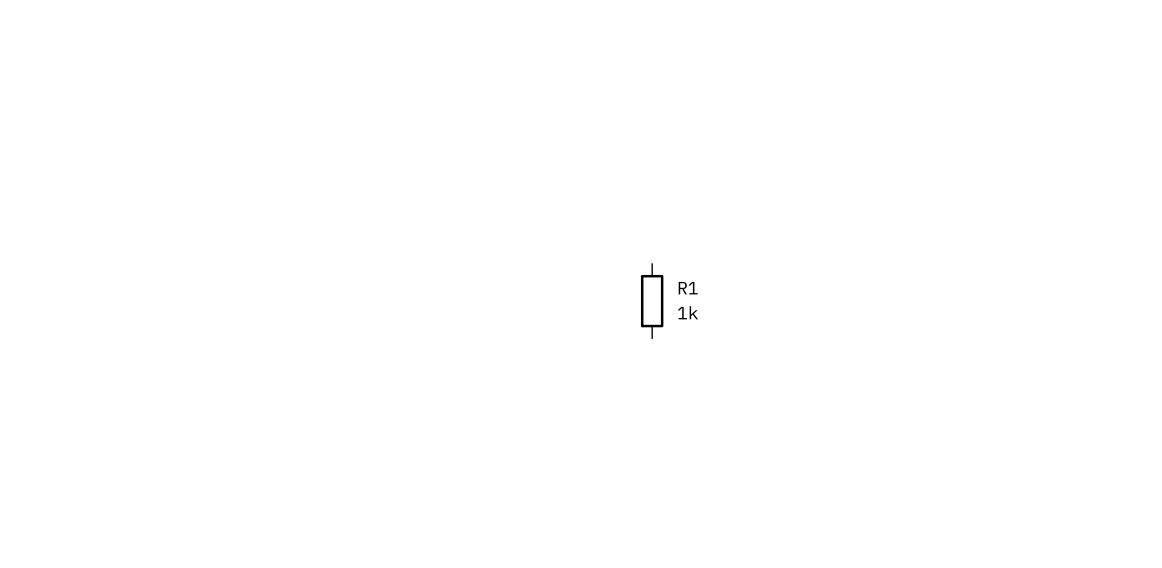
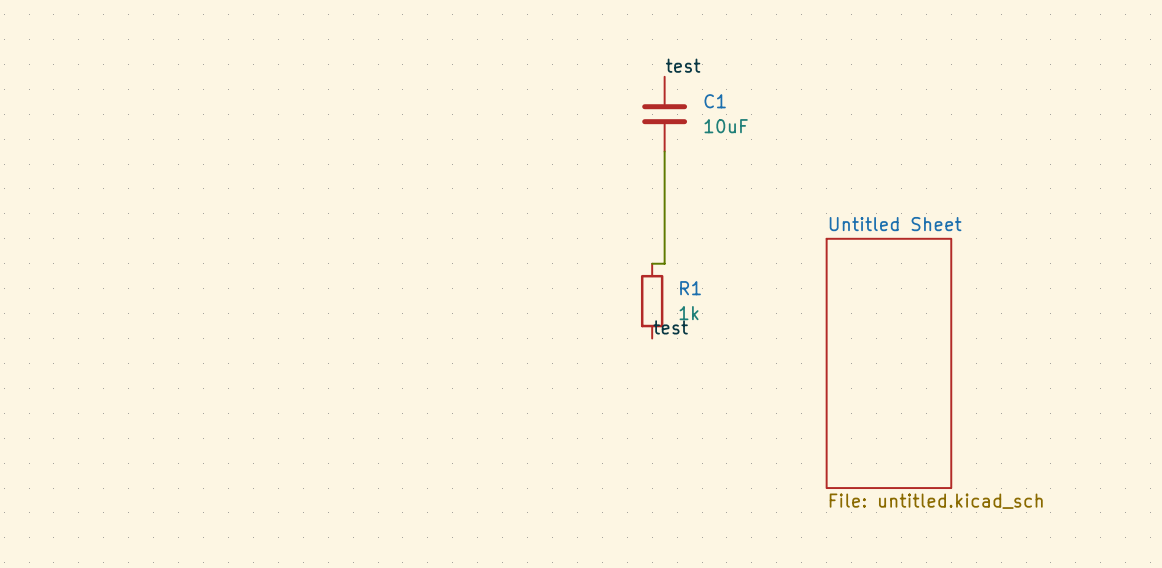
label: none -> test (683, 65)
C1: none -> 10uF (664, 114)
wire: none -> (664, 151) (664, 263) (652, 263)
label: none -> test (670, 327)
sheet Untitled Sheet: none -> File: untitled.kicad_sch (888, 363)

